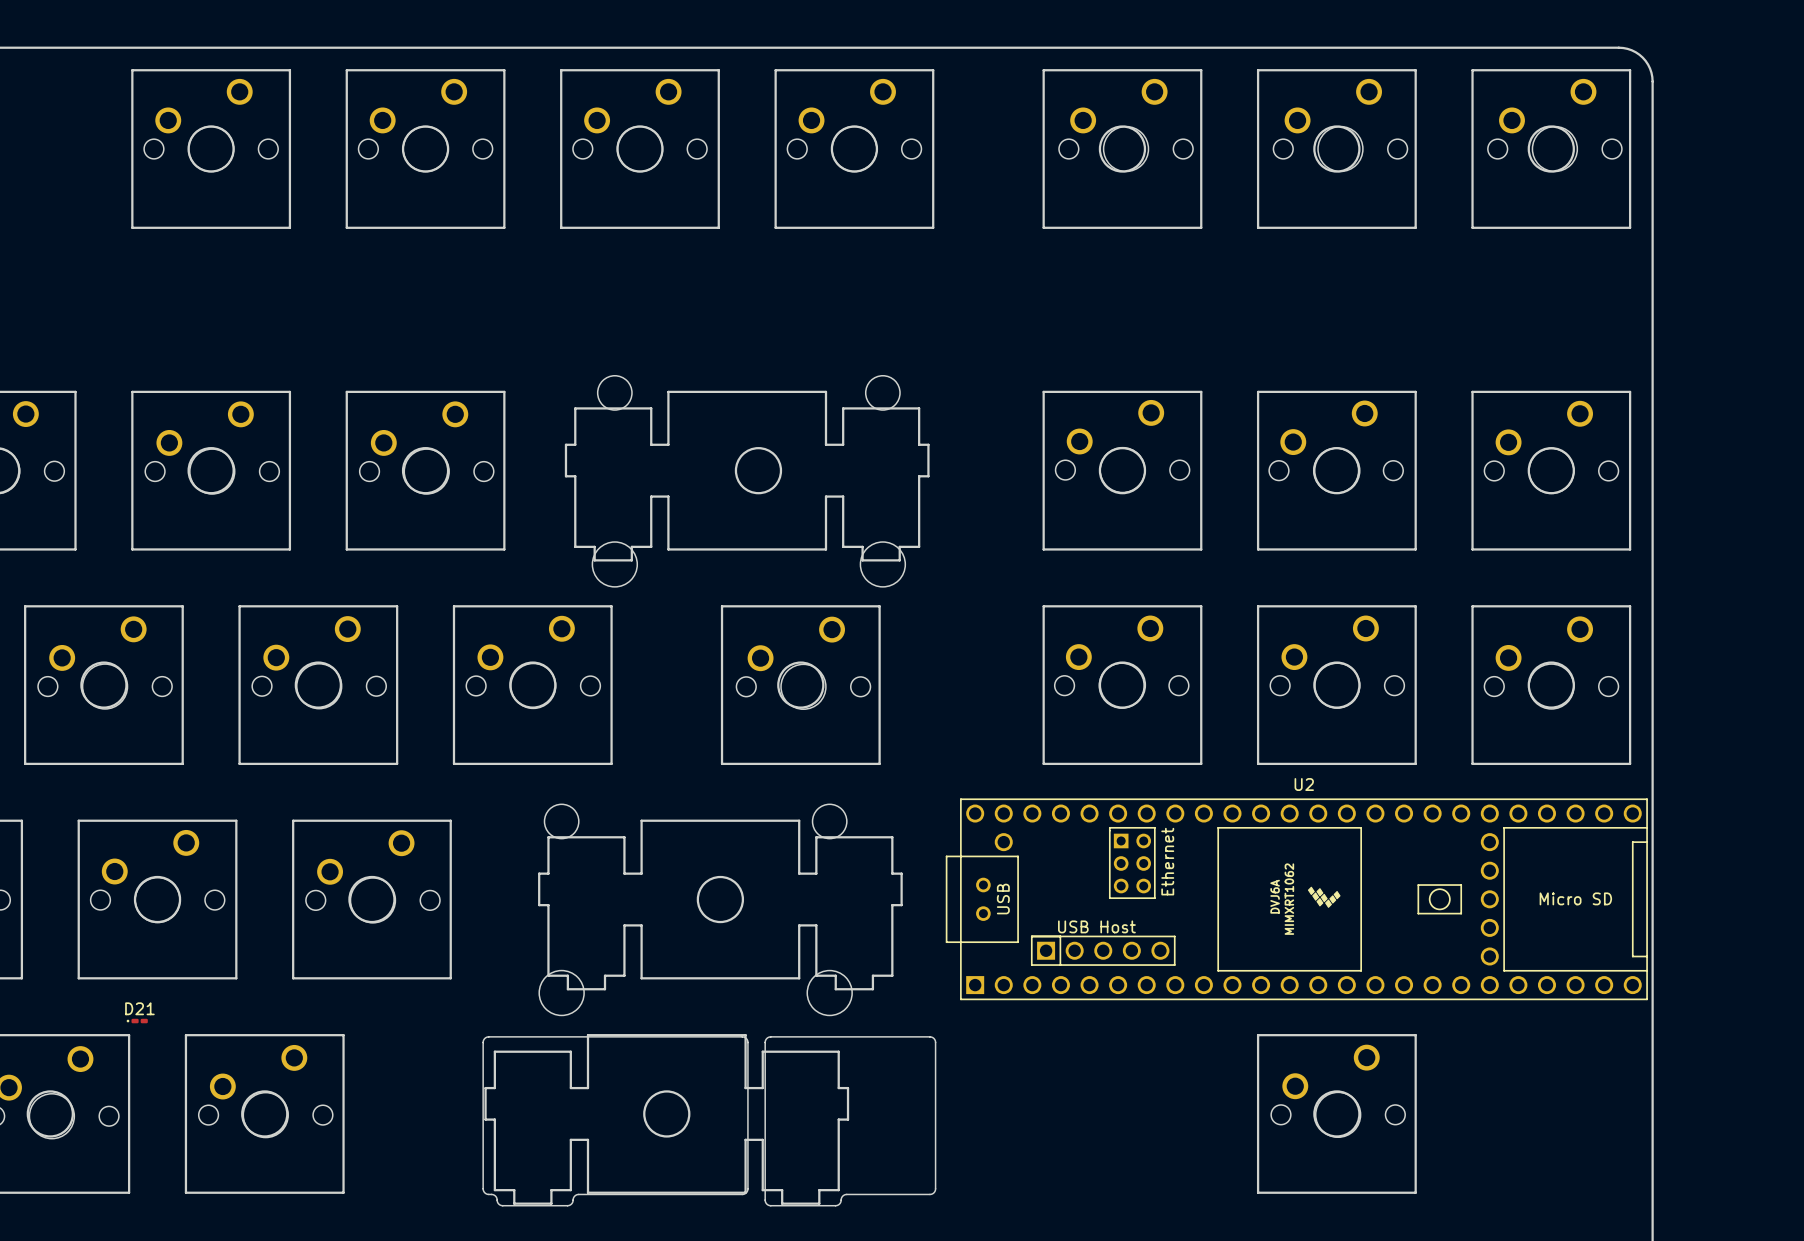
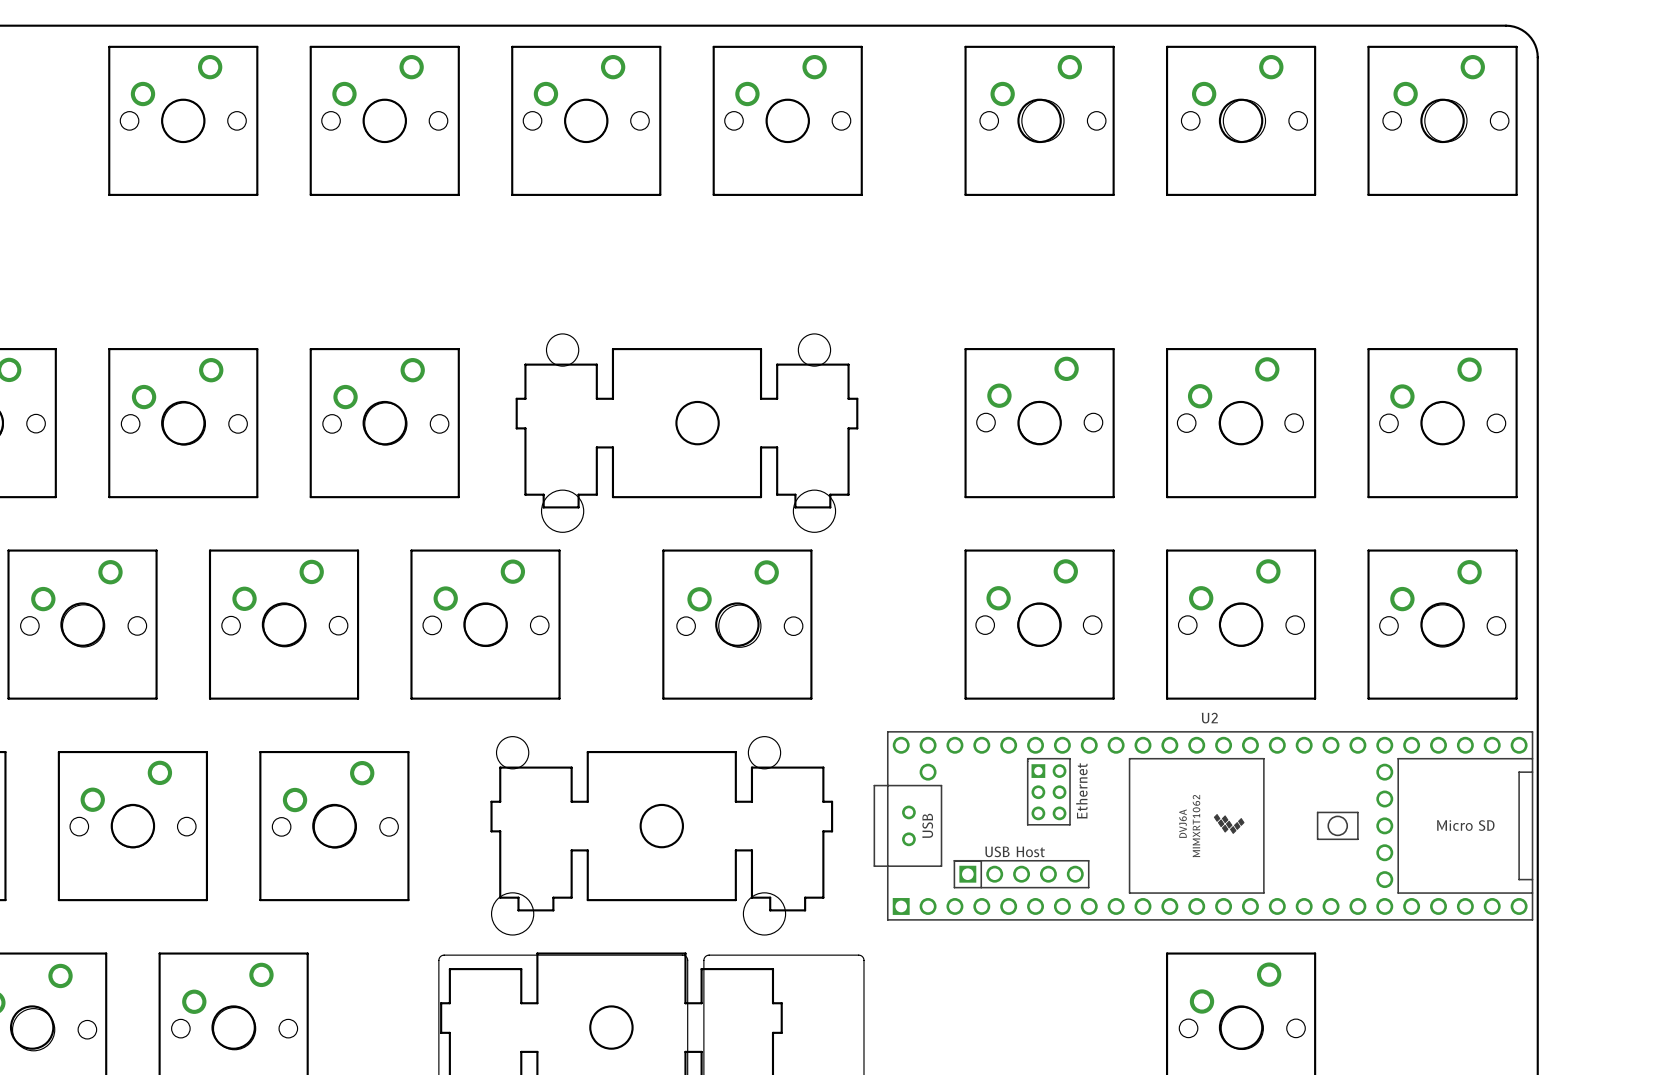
D21: (137, 1021) -> none

